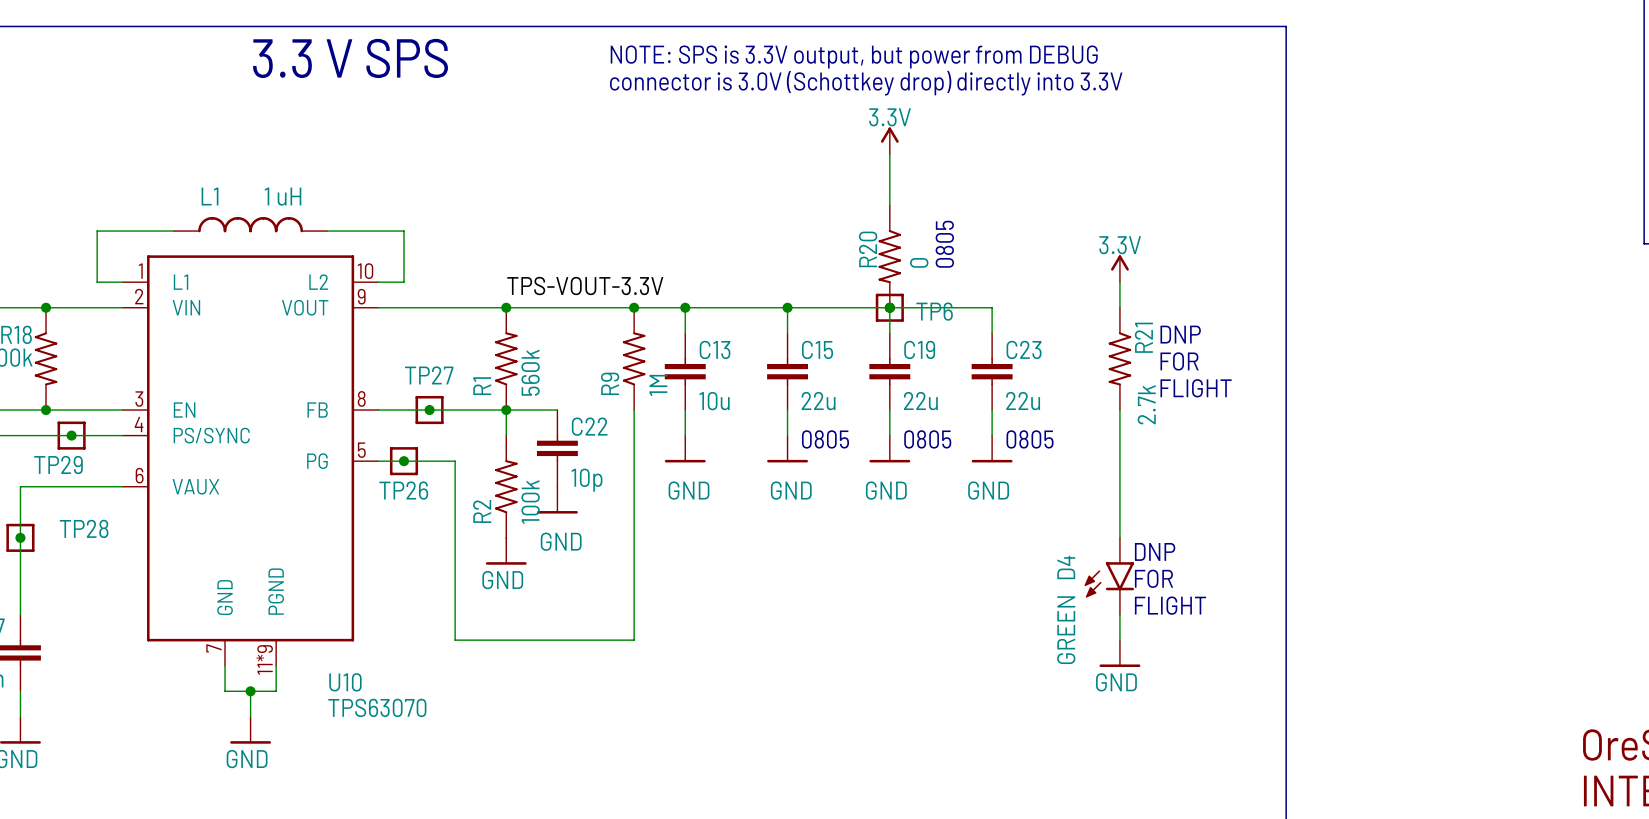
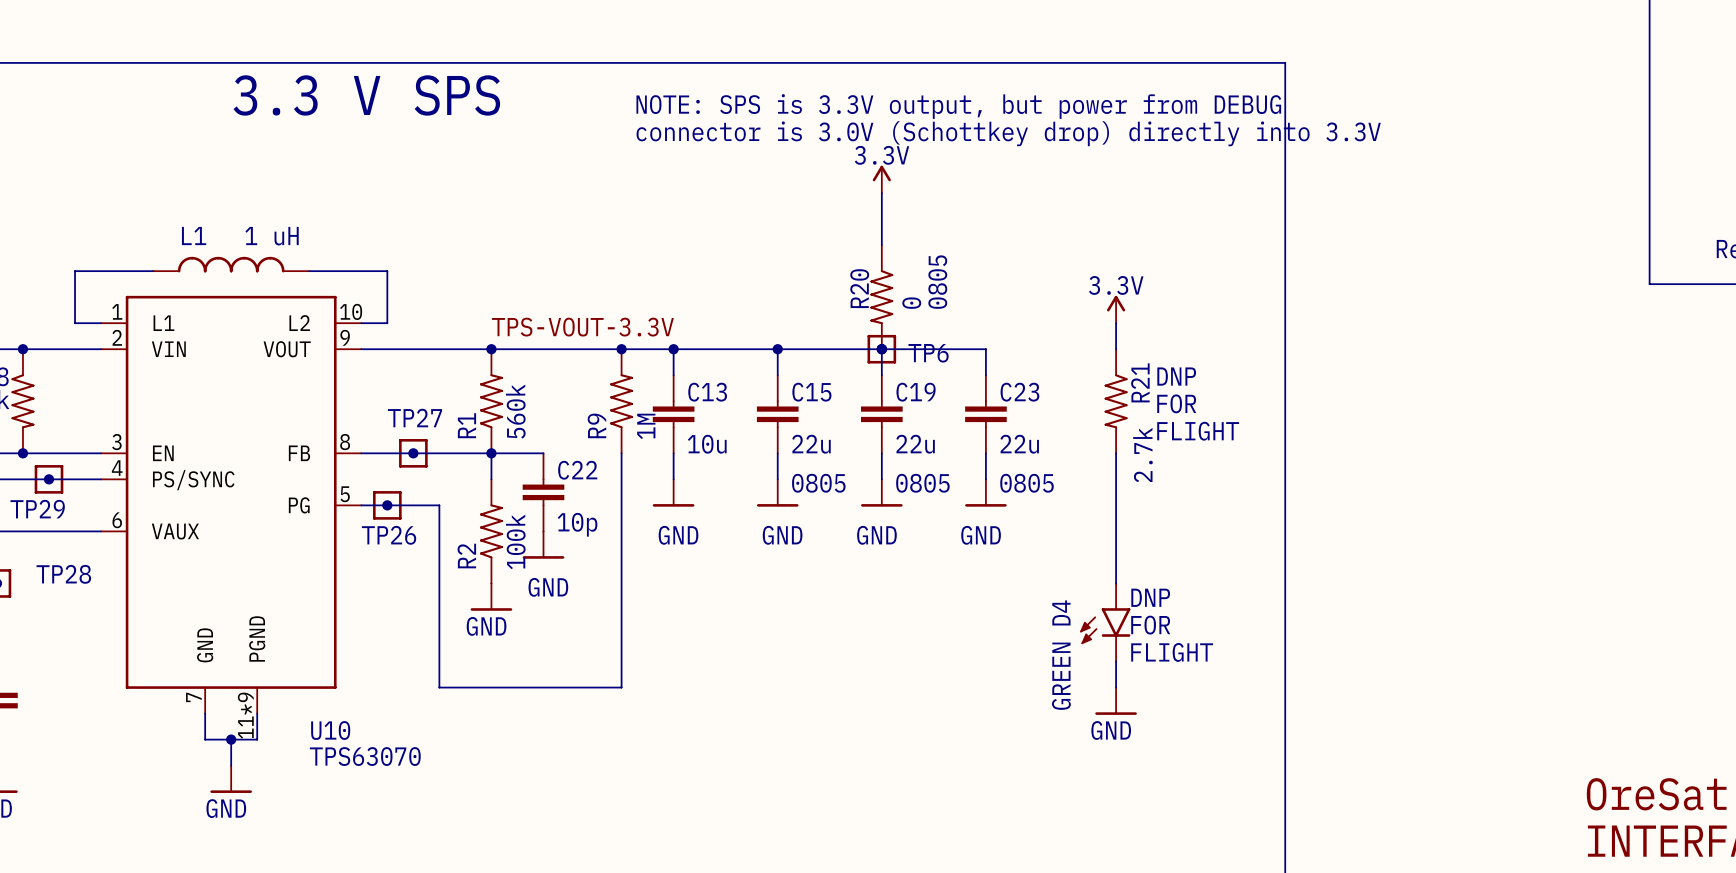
text position: NOTE: SPS is 3.3V output, but power from DEBUG (854, 56) -> NOTE: SPS is 3.3V output, but power from DEBUG (958, 106)
text position: connector is 3.0V (Schottkey drop) directly into 3.3V (866, 83) -> connector is 3.0V (Schottkey drop) directly into 3.3V (1008, 133)

